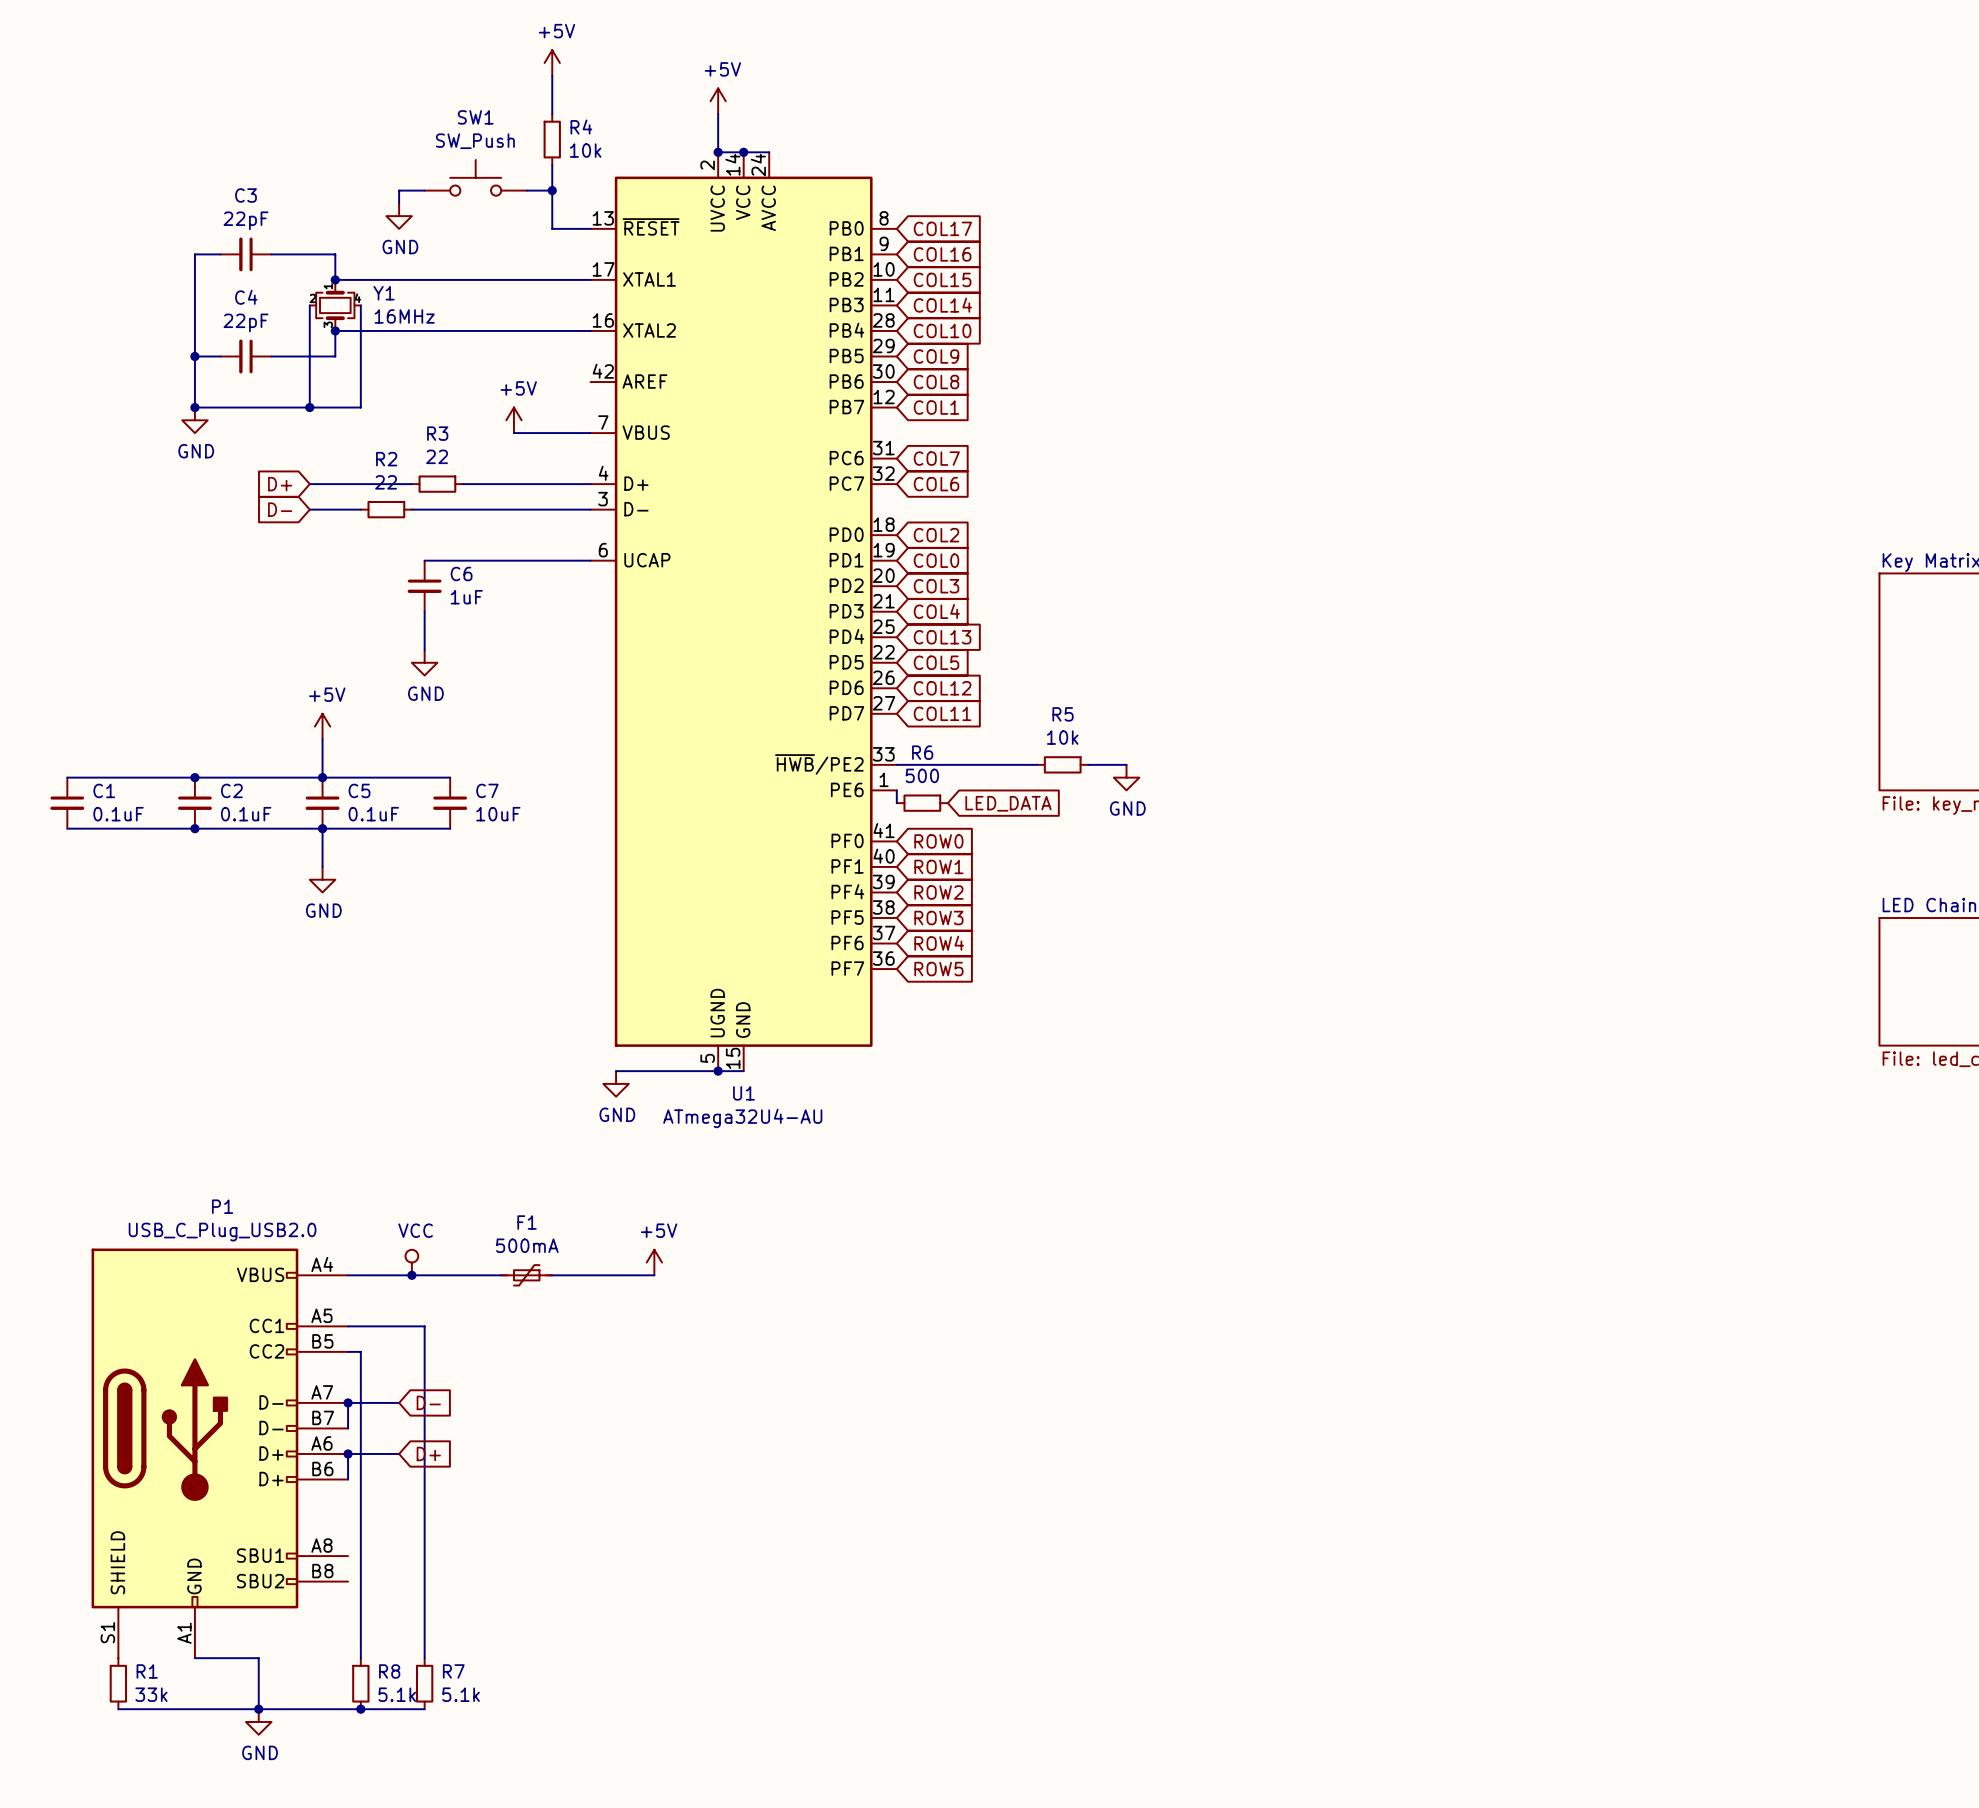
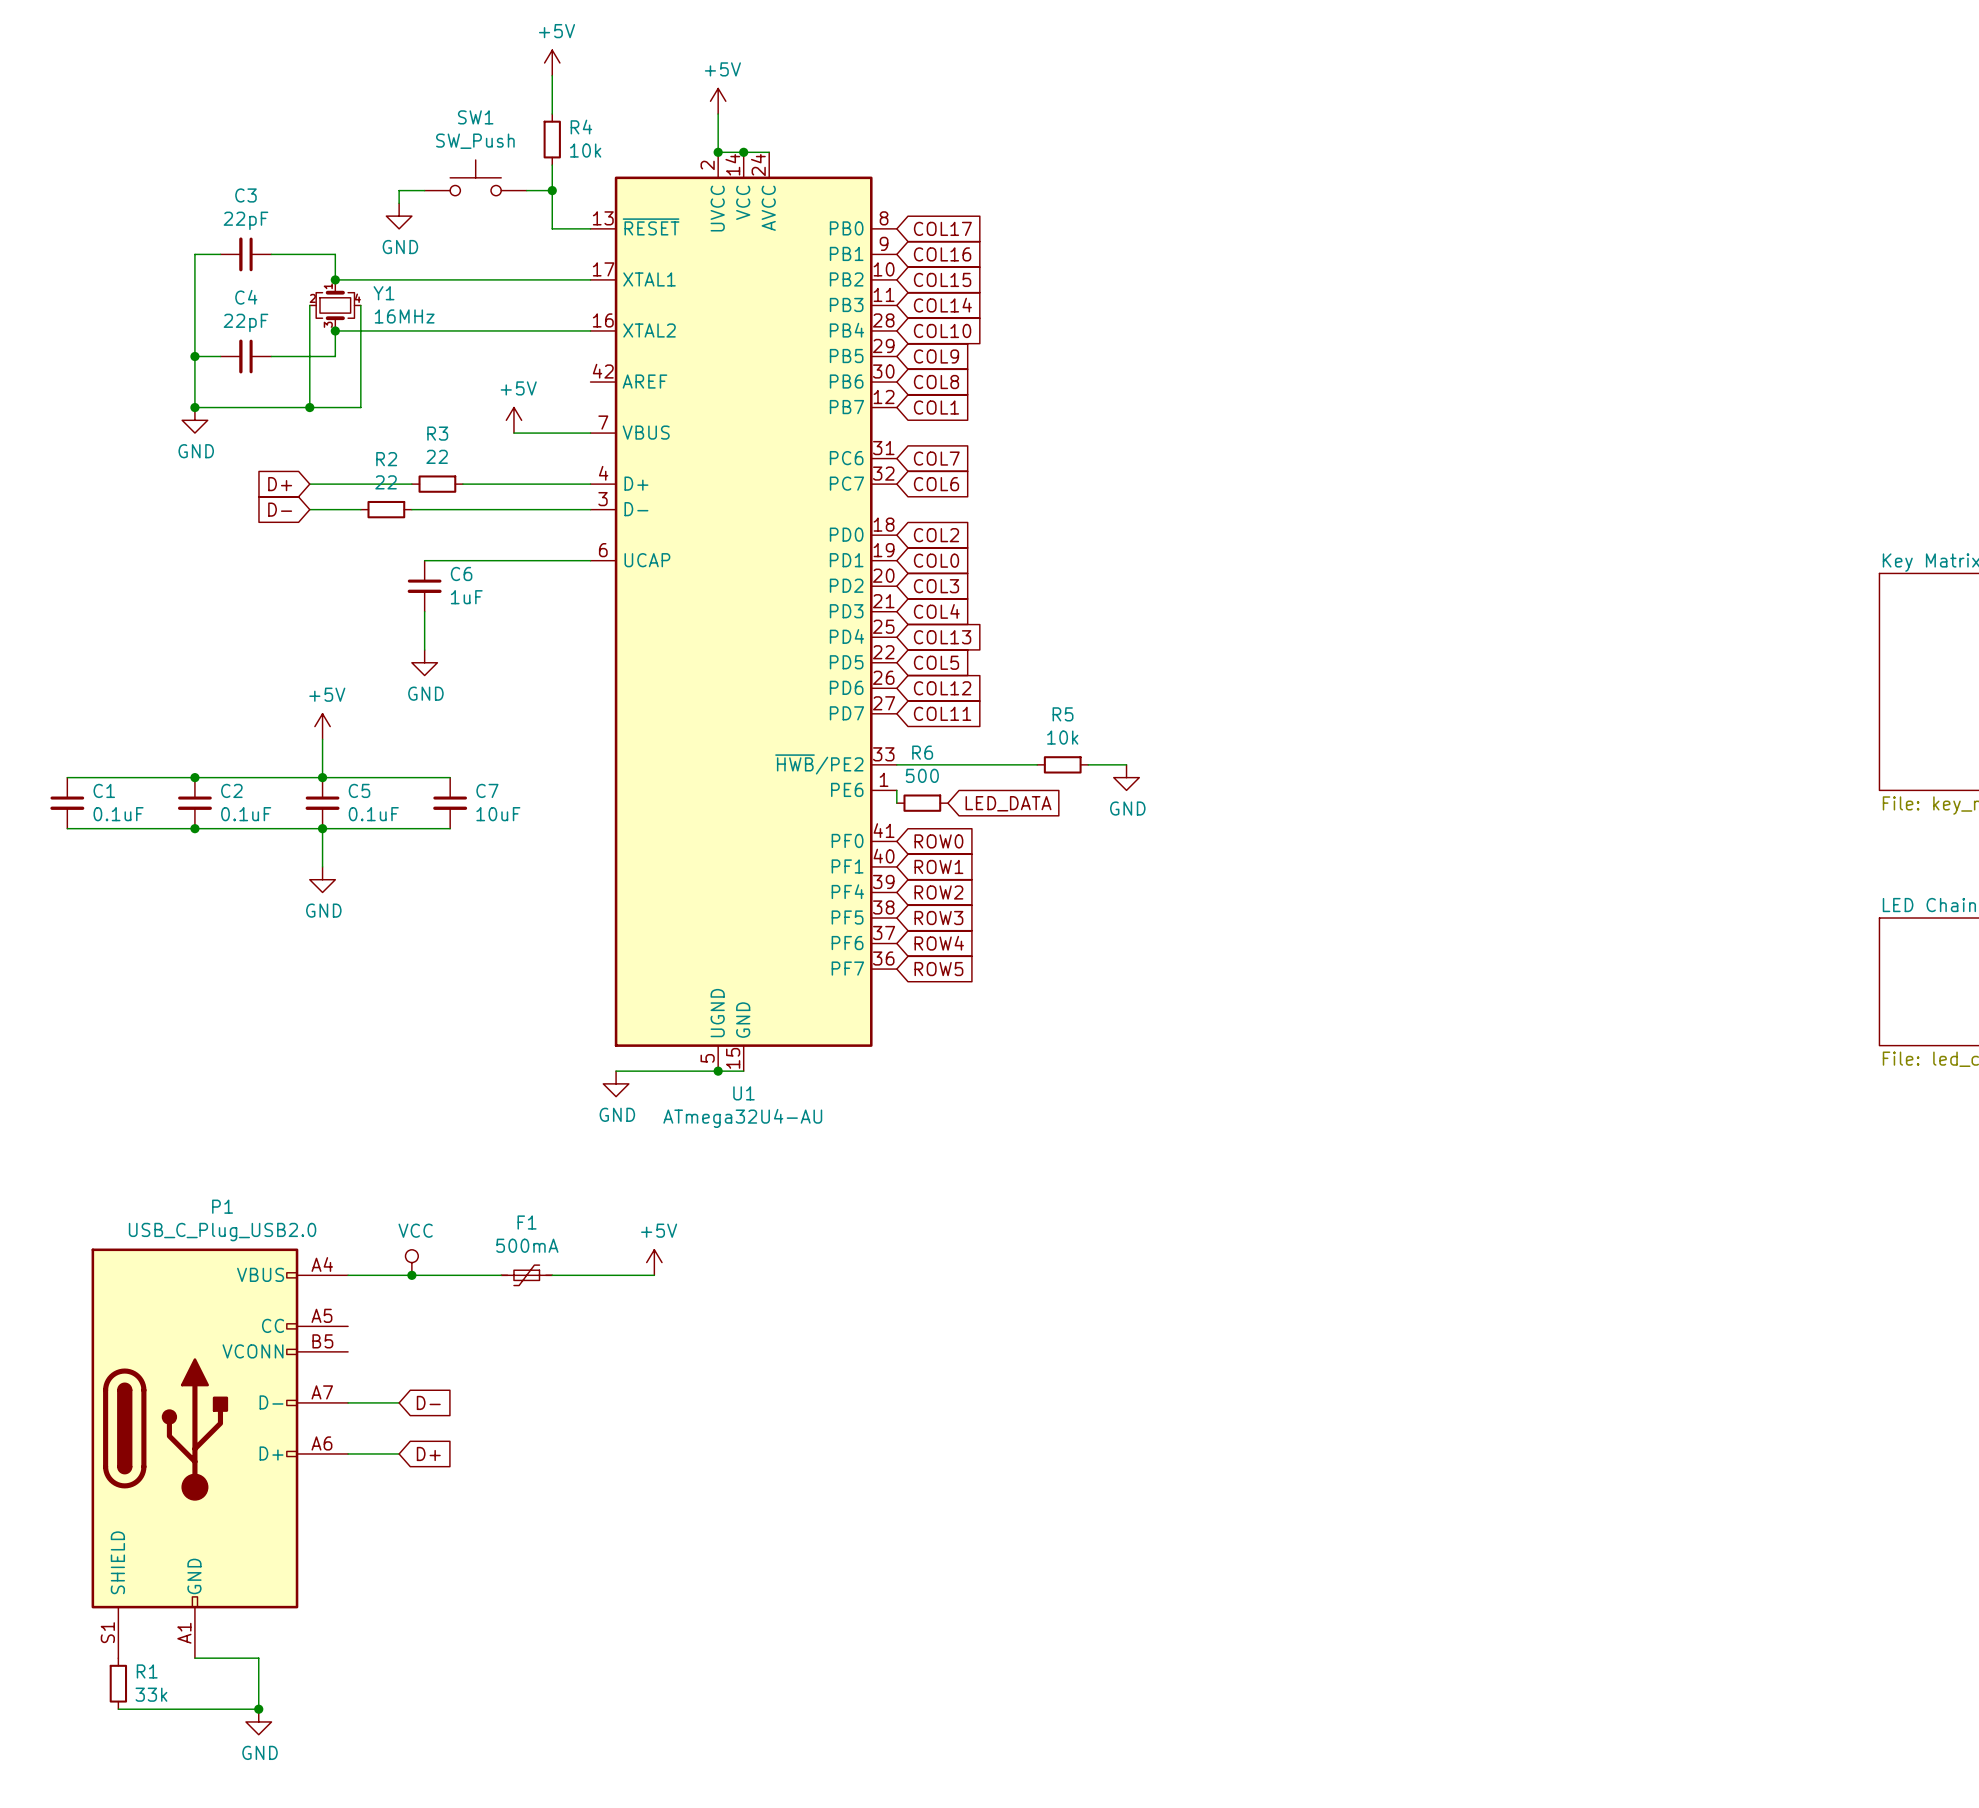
P1 symbol: [91, 1248, 349, 1659] -> [91, 1248, 349, 1659]
wire: (348, 1326) (424, 1326) (424, 1658) -> none
wire: (348, 1351) (360, 1351) (360, 1658) -> none
wire: (348, 1402) (348, 1428) -> none
junction: (348, 1402) -> none
wire: (348, 1453) (348, 1479) -> none
junction: (348, 1453) -> none
R8: 5.1k (360, 1683) -> none
R7: 5.1k (424, 1683) -> none
wire: (258, 1709) (424, 1709) -> none
junction: (360, 1709) -> none

